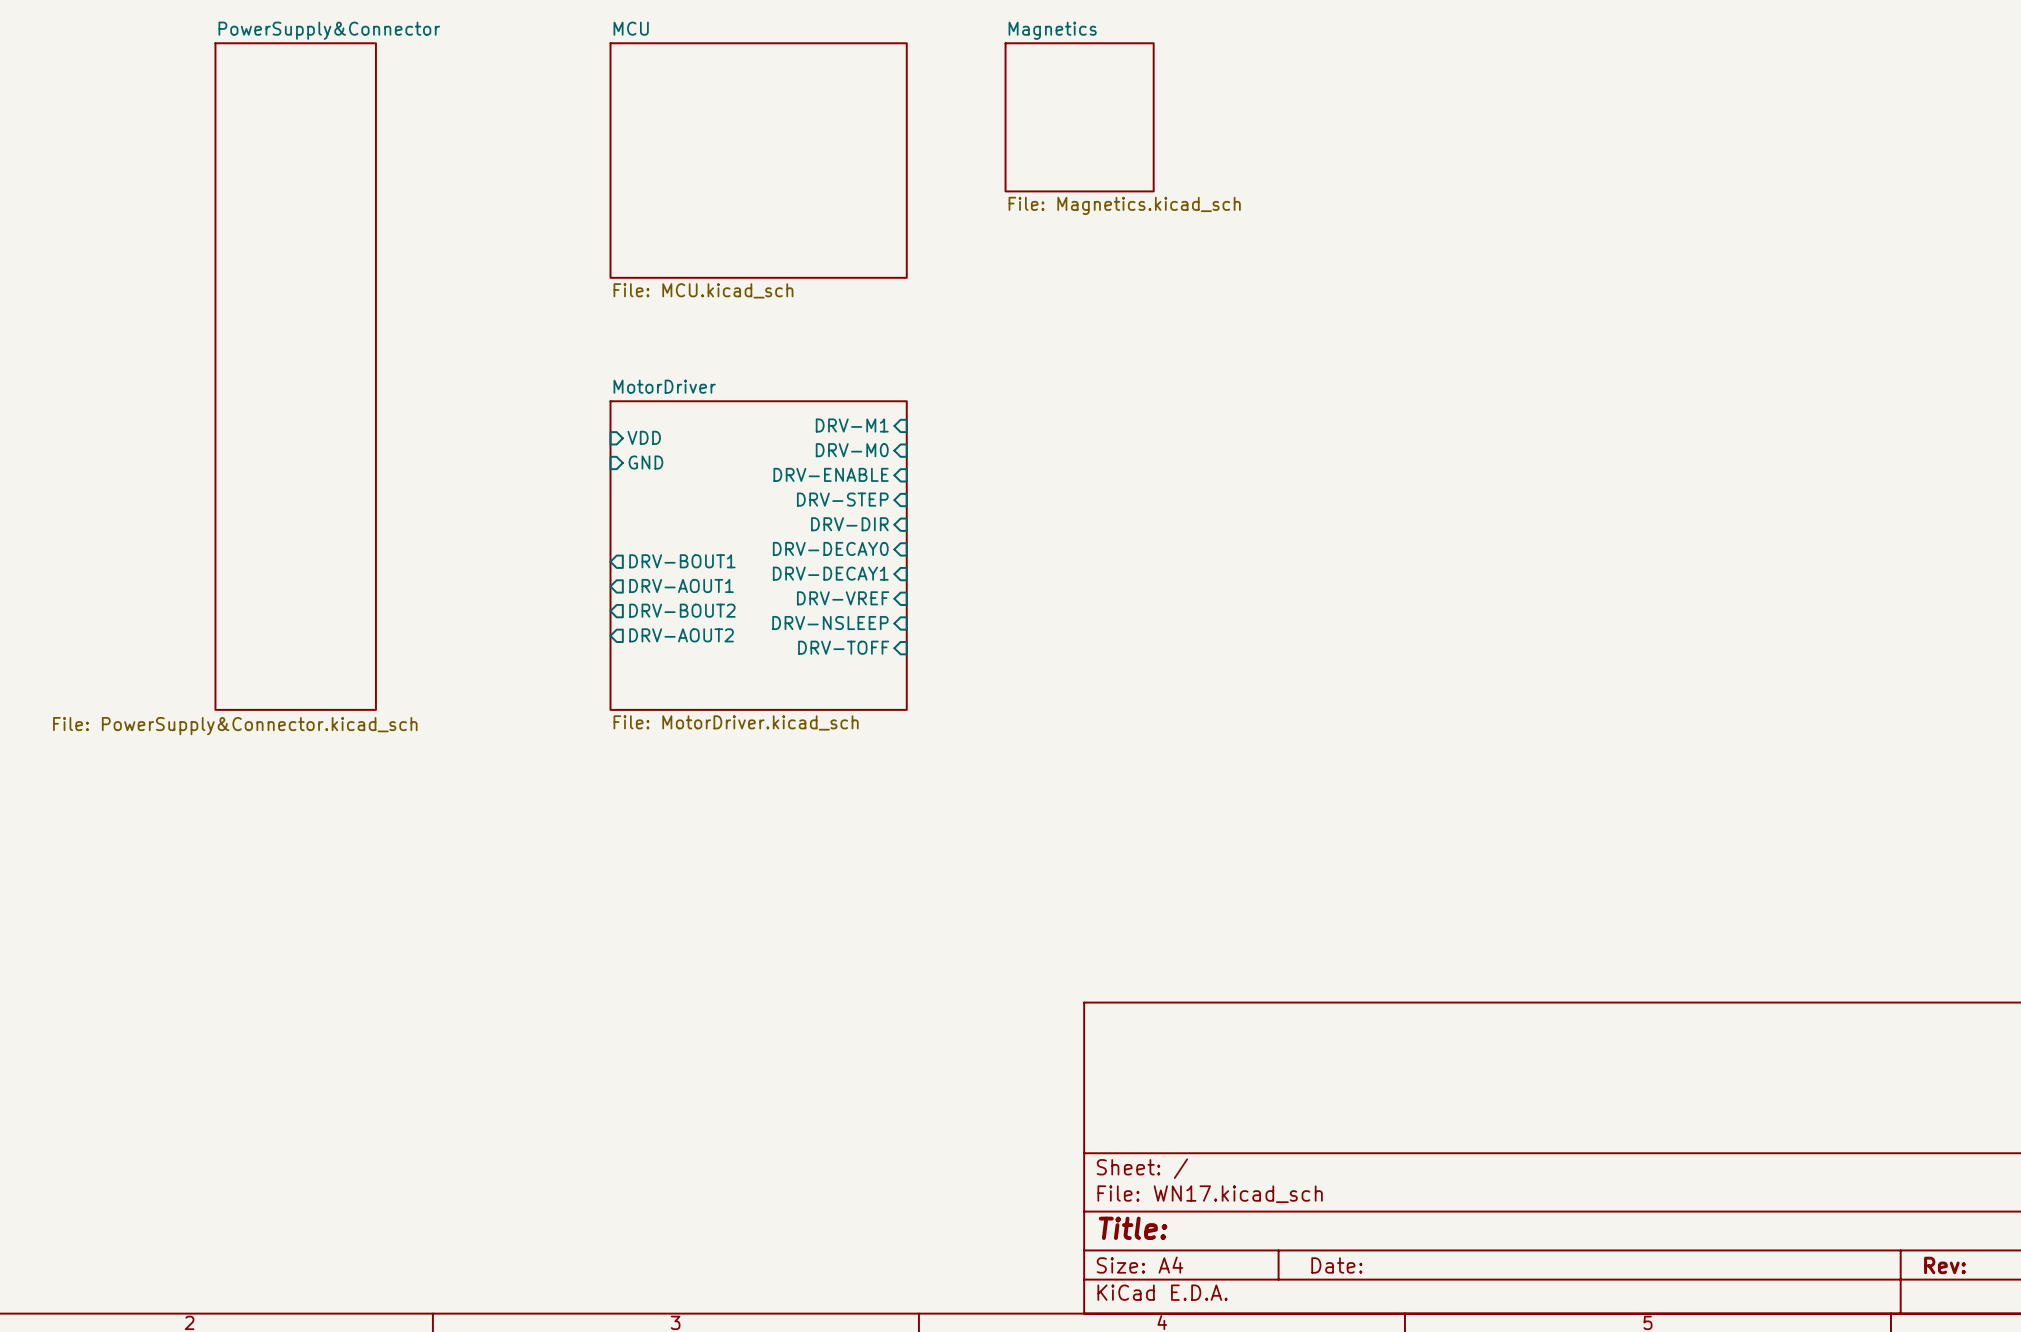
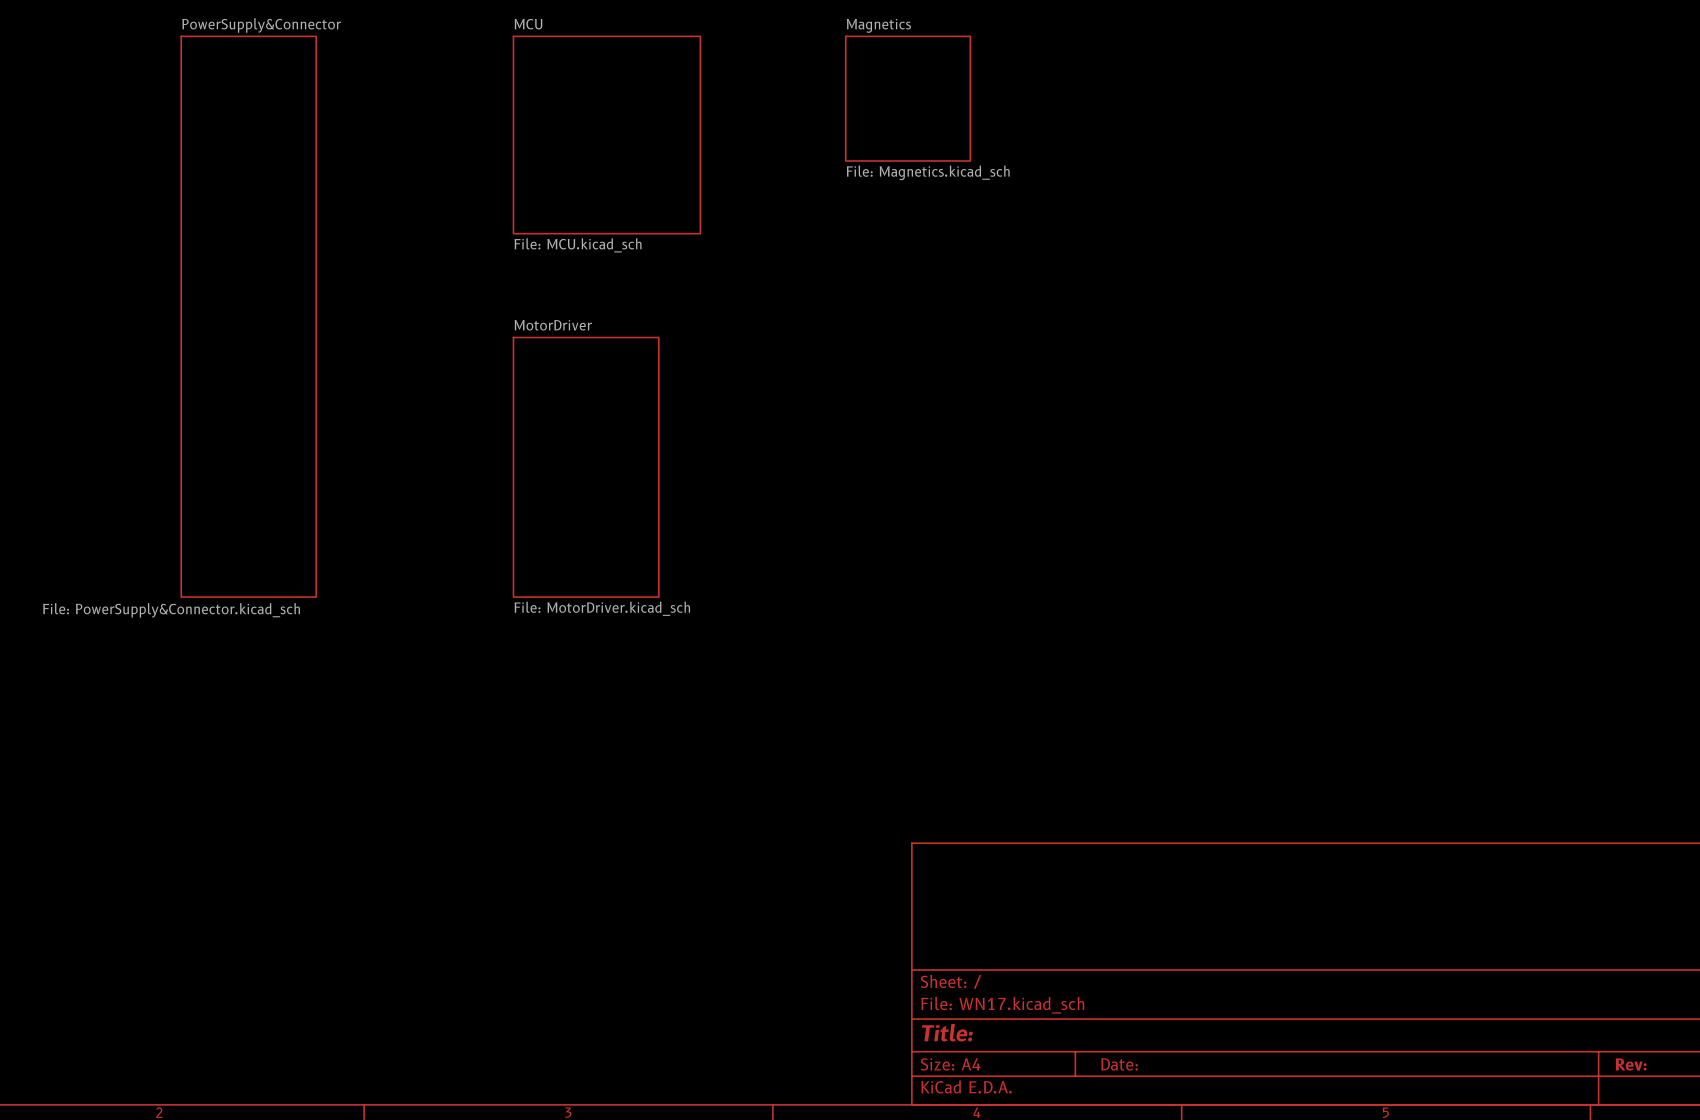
sheet MCU: none -> File: MCU.kicad_sch (606, 135)
sheet MCU: File: MCU.kicad_sch (758, 160) -> none
sheet pin: DRV-M1 (852, 425) -> none
sheet pin: VDD (644, 437) -> none
sheet pin: DRV-M0 (852, 450) -> none
sheet pin: GND (645, 462) -> none
sheet pin: DRV-ENABLE (831, 474) -> none
sheet pin: DRV-STEP (842, 499) -> none
sheet pin: DRV-DIR (849, 524) -> none
sheet pin: DRV-DECAY0 (830, 548) -> none
sheet MotorDriver: none -> File: MotorDriver.kicad_sch (586, 467)
sheet MotorDriver: File: MotorDriver.kicad_sch (758, 555) -> none
sheet pin: DRV-BOUT1 (682, 561) -> none
sheet pin: DRV-DECAY1 (830, 573) -> none
sheet pin: DRV-AOUT1 (681, 585) -> none
sheet pin: DRV-VREF (843, 598) -> none
sheet pin: DRV-BOUT2 (682, 610) -> none
sheet pin: DRV-NSLEEP (830, 623) -> none
sheet pin: DRV-AOUT2 (681, 635) -> none
sheet pin: DRV-TOFF (843, 647) -> none

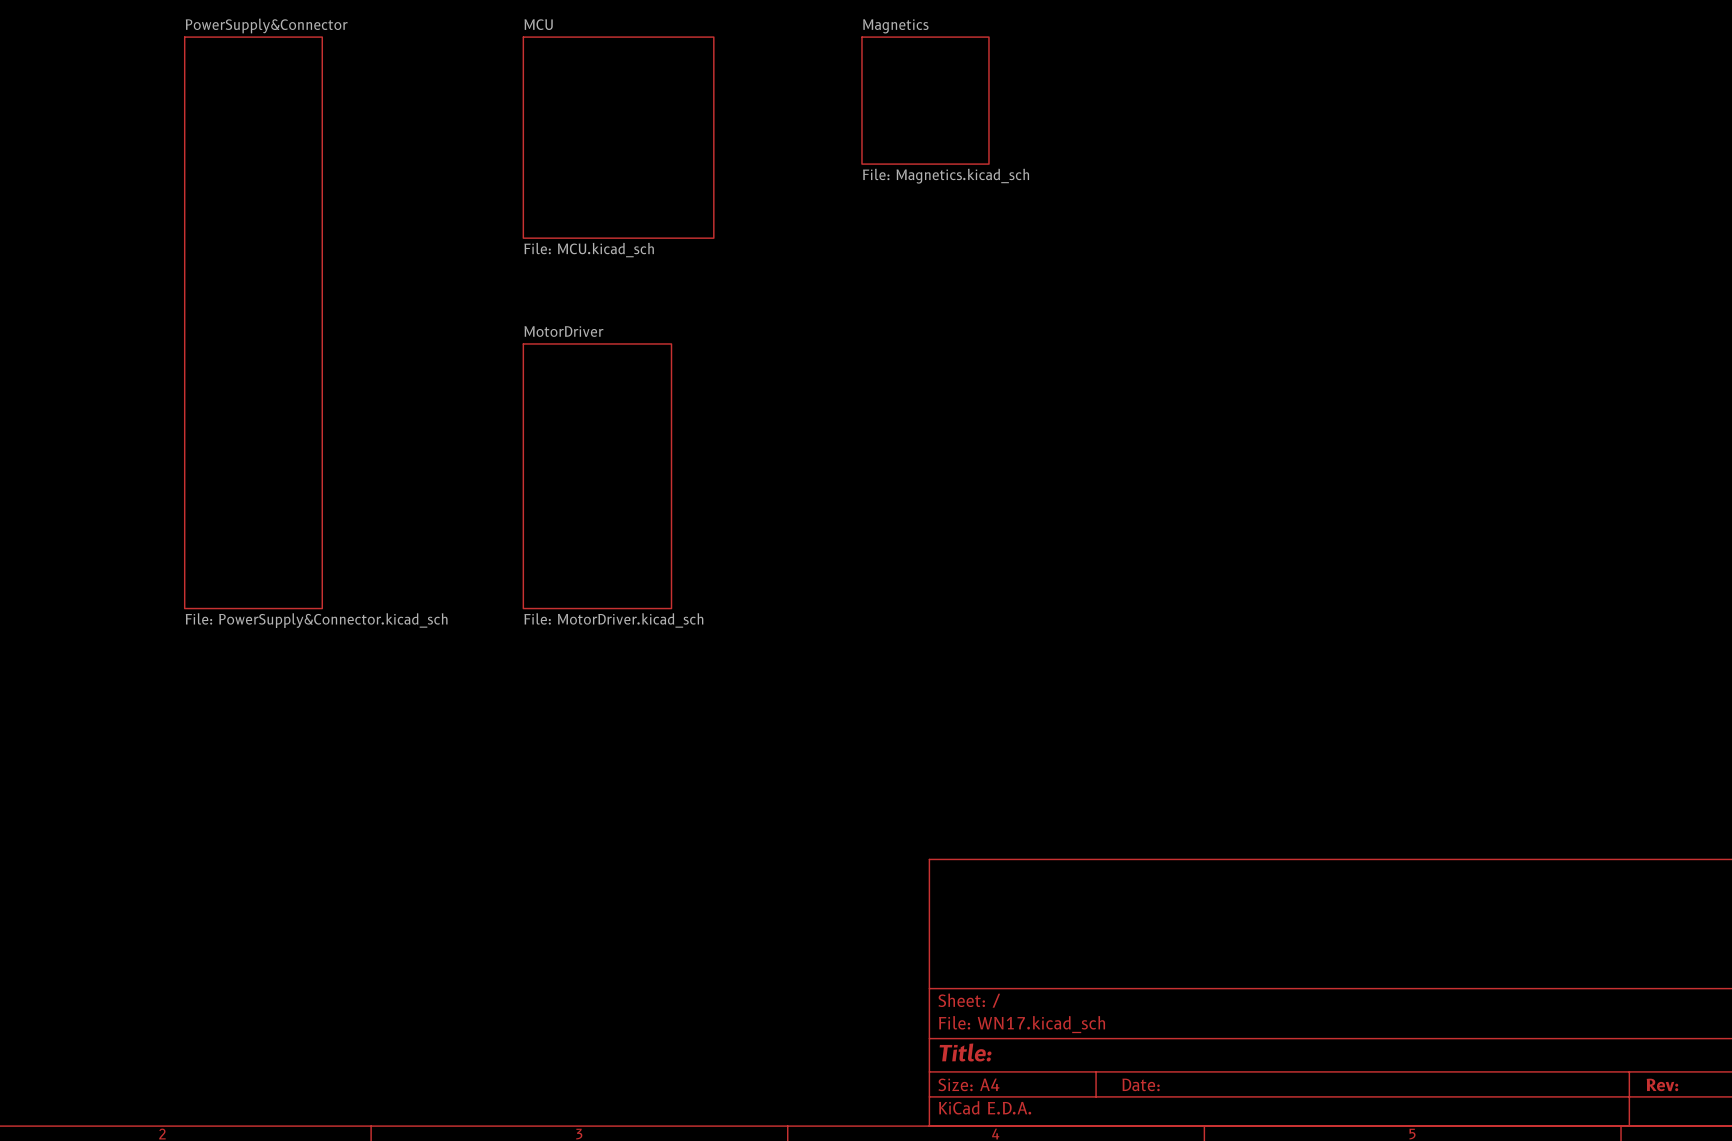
sheet PowerSupply&Connector value position: File: PowerSupply&Connector.kicad_sch (171, 610) -> File: PowerSupply&Connector.kicad_sch (316, 620)

